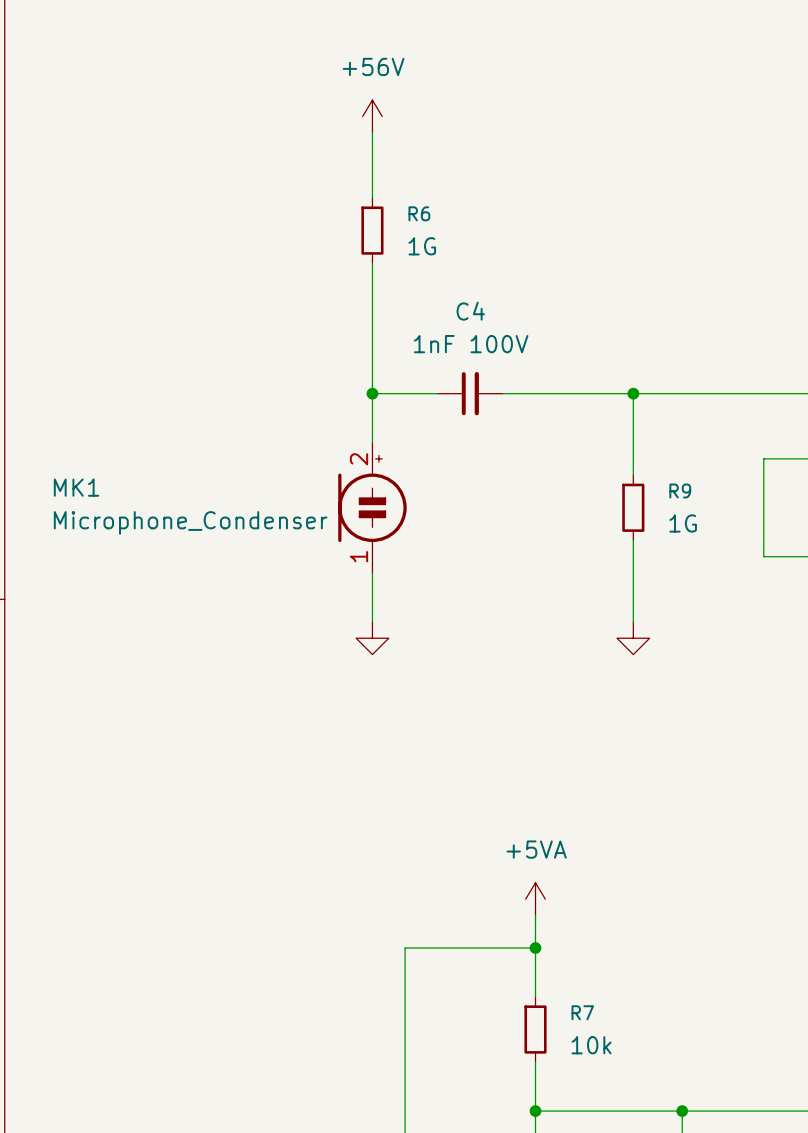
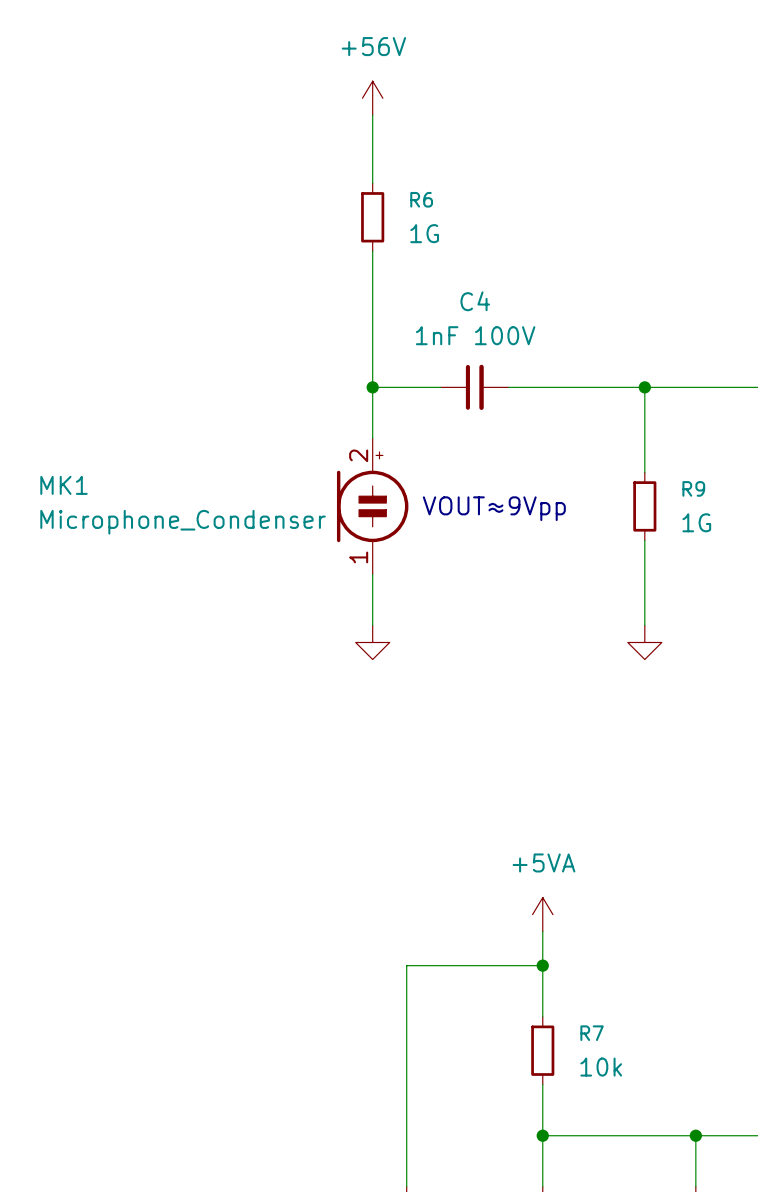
text: none -> VOUT≈9Vpp (494, 508)

